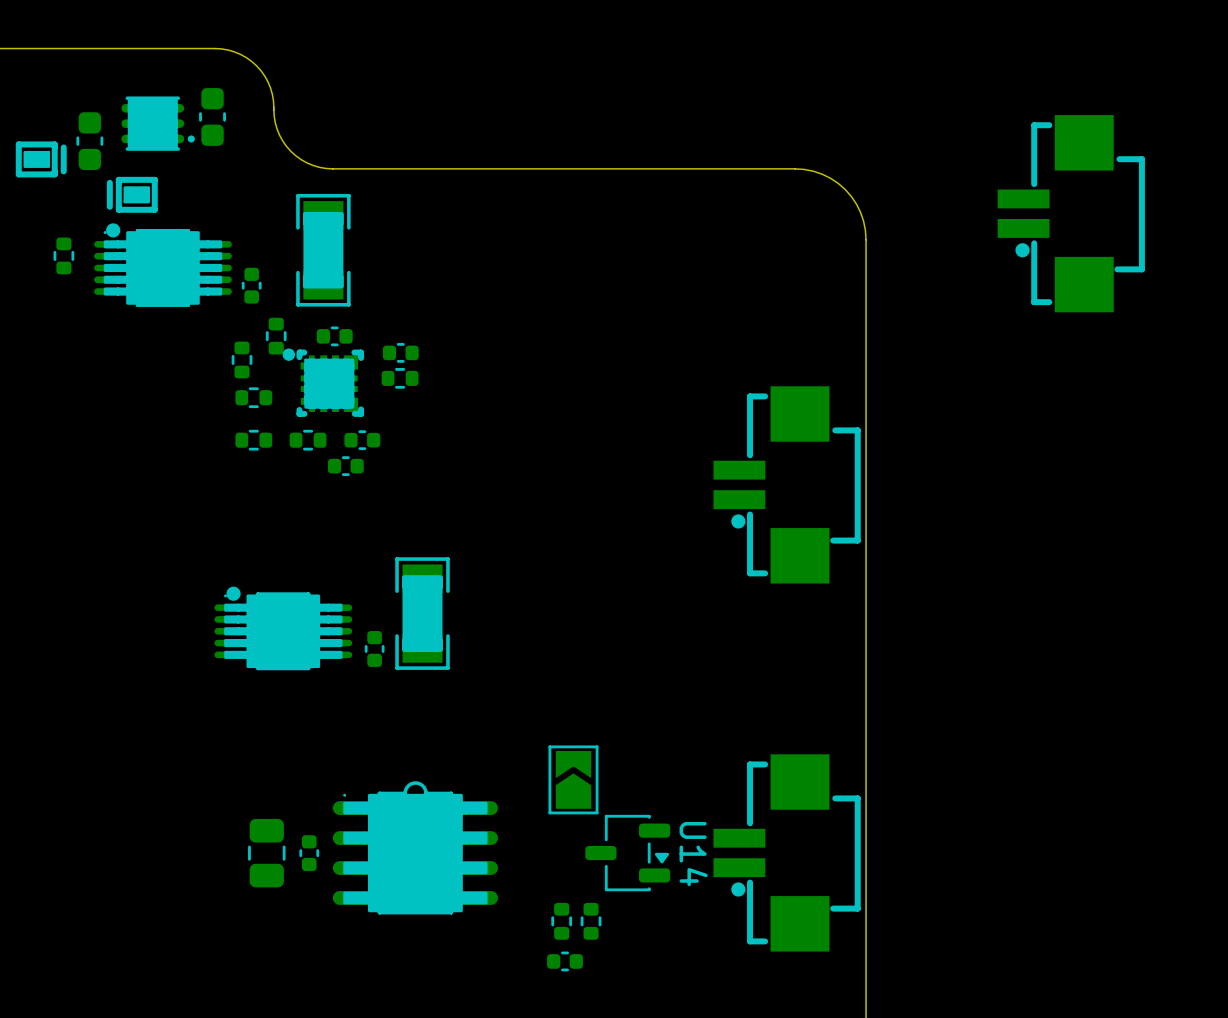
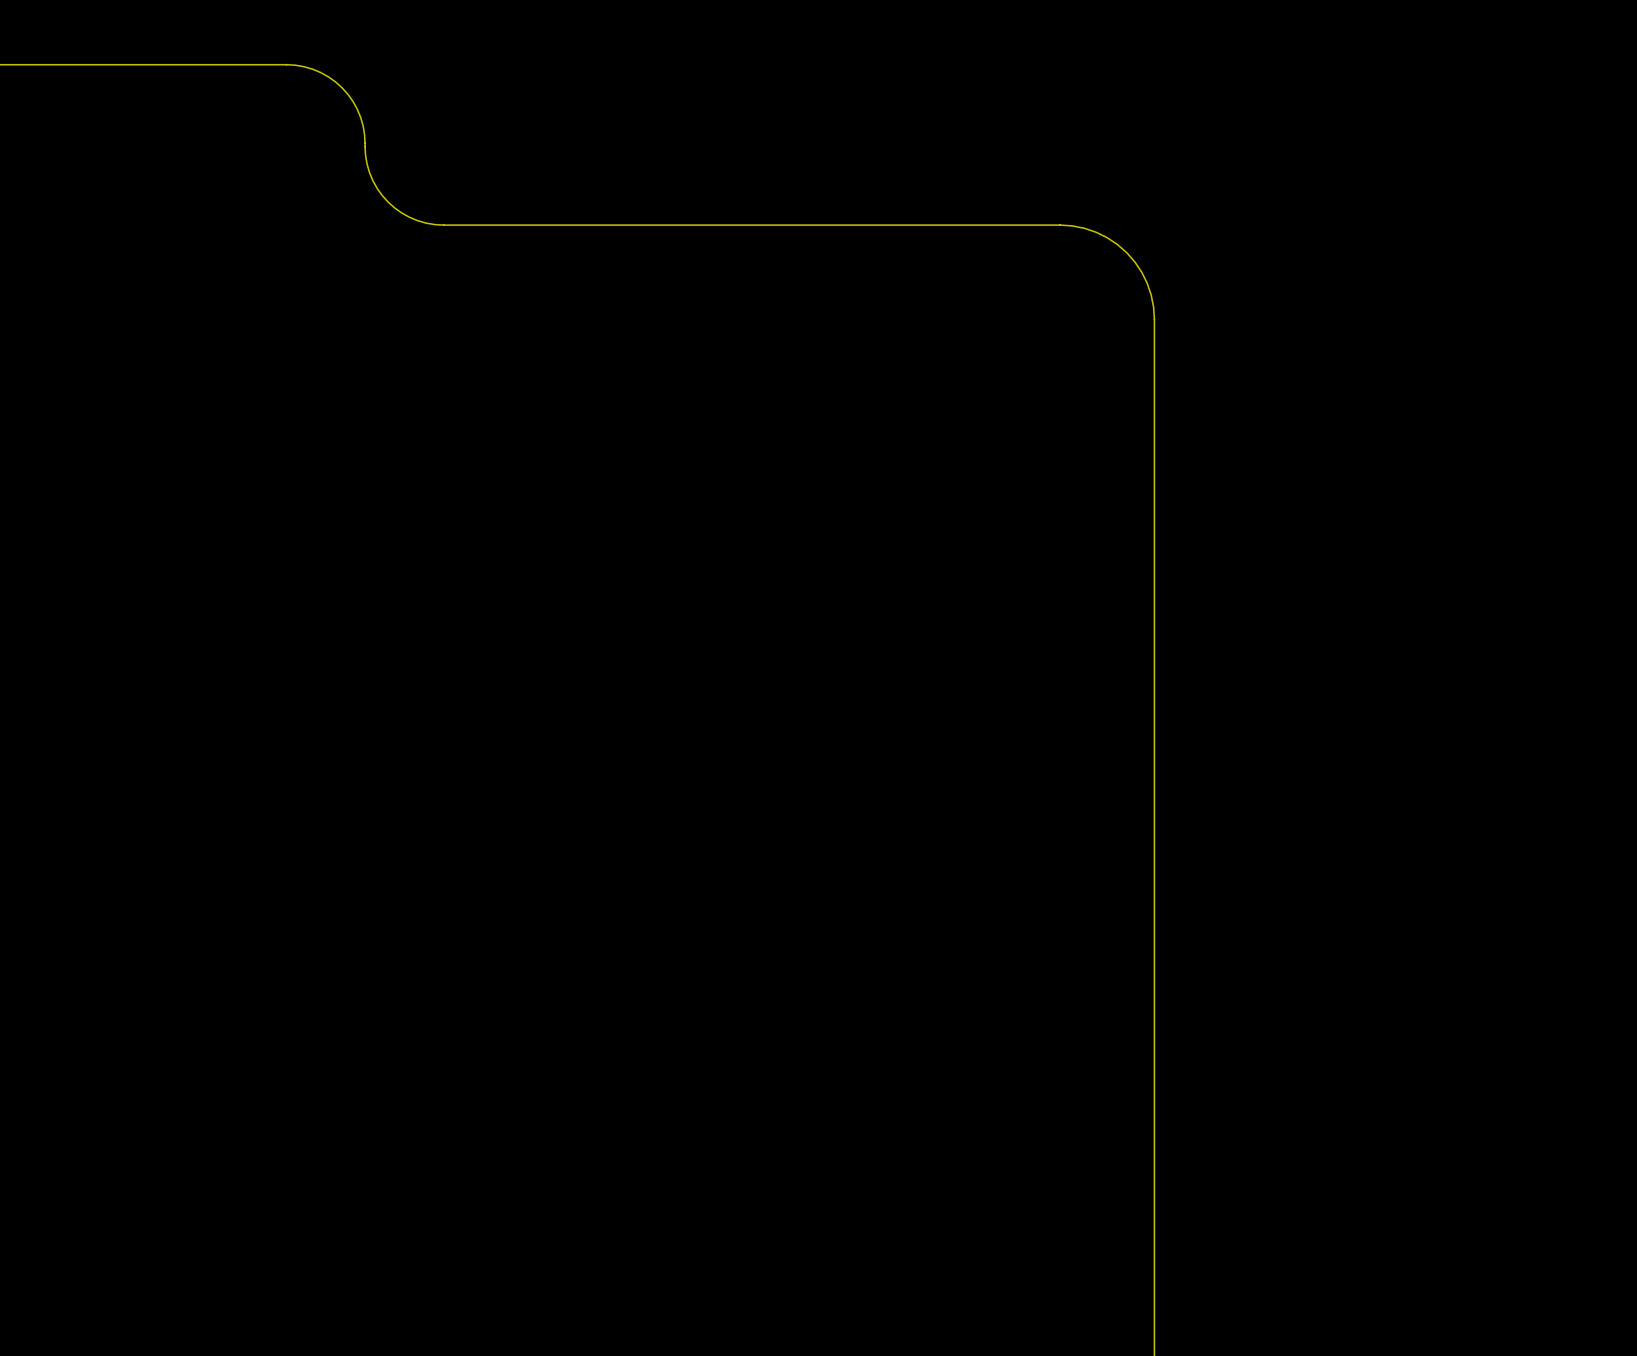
part: (212, 116) -> none
part: (158, 123) -> none
part: (89, 141) -> none
part: (41, 159) -> none
part: (132, 194) -> none
part: (1071, 213) -> none
part: (323, 250) -> none
part: (63, 255) -> none
part: (162, 265) -> none
part: (251, 285) -> none
part: (276, 336) -> none
part: (334, 336) -> none
part: (400, 352) -> none
part: (242, 359) -> none
part: (400, 378) -> none
part: (323, 382) -> none
part: (253, 397) -> none
part: (253, 440) -> none
part: (308, 440) -> none
part: (362, 440) -> none
part: (345, 466) -> none
part: (787, 484) -> none
part: (422, 613) -> none
part: (283, 628) -> none
part: (374, 648) -> none
part: (573, 779) -> none
part: (415, 847) -> none
U14: (787, 852) -> none
part: (266, 853) -> none
part: (309, 853) -> none
part: (627, 853) -> none
part: (561, 921) -> none
part: (591, 921) -> none
part: (565, 961) -> none

